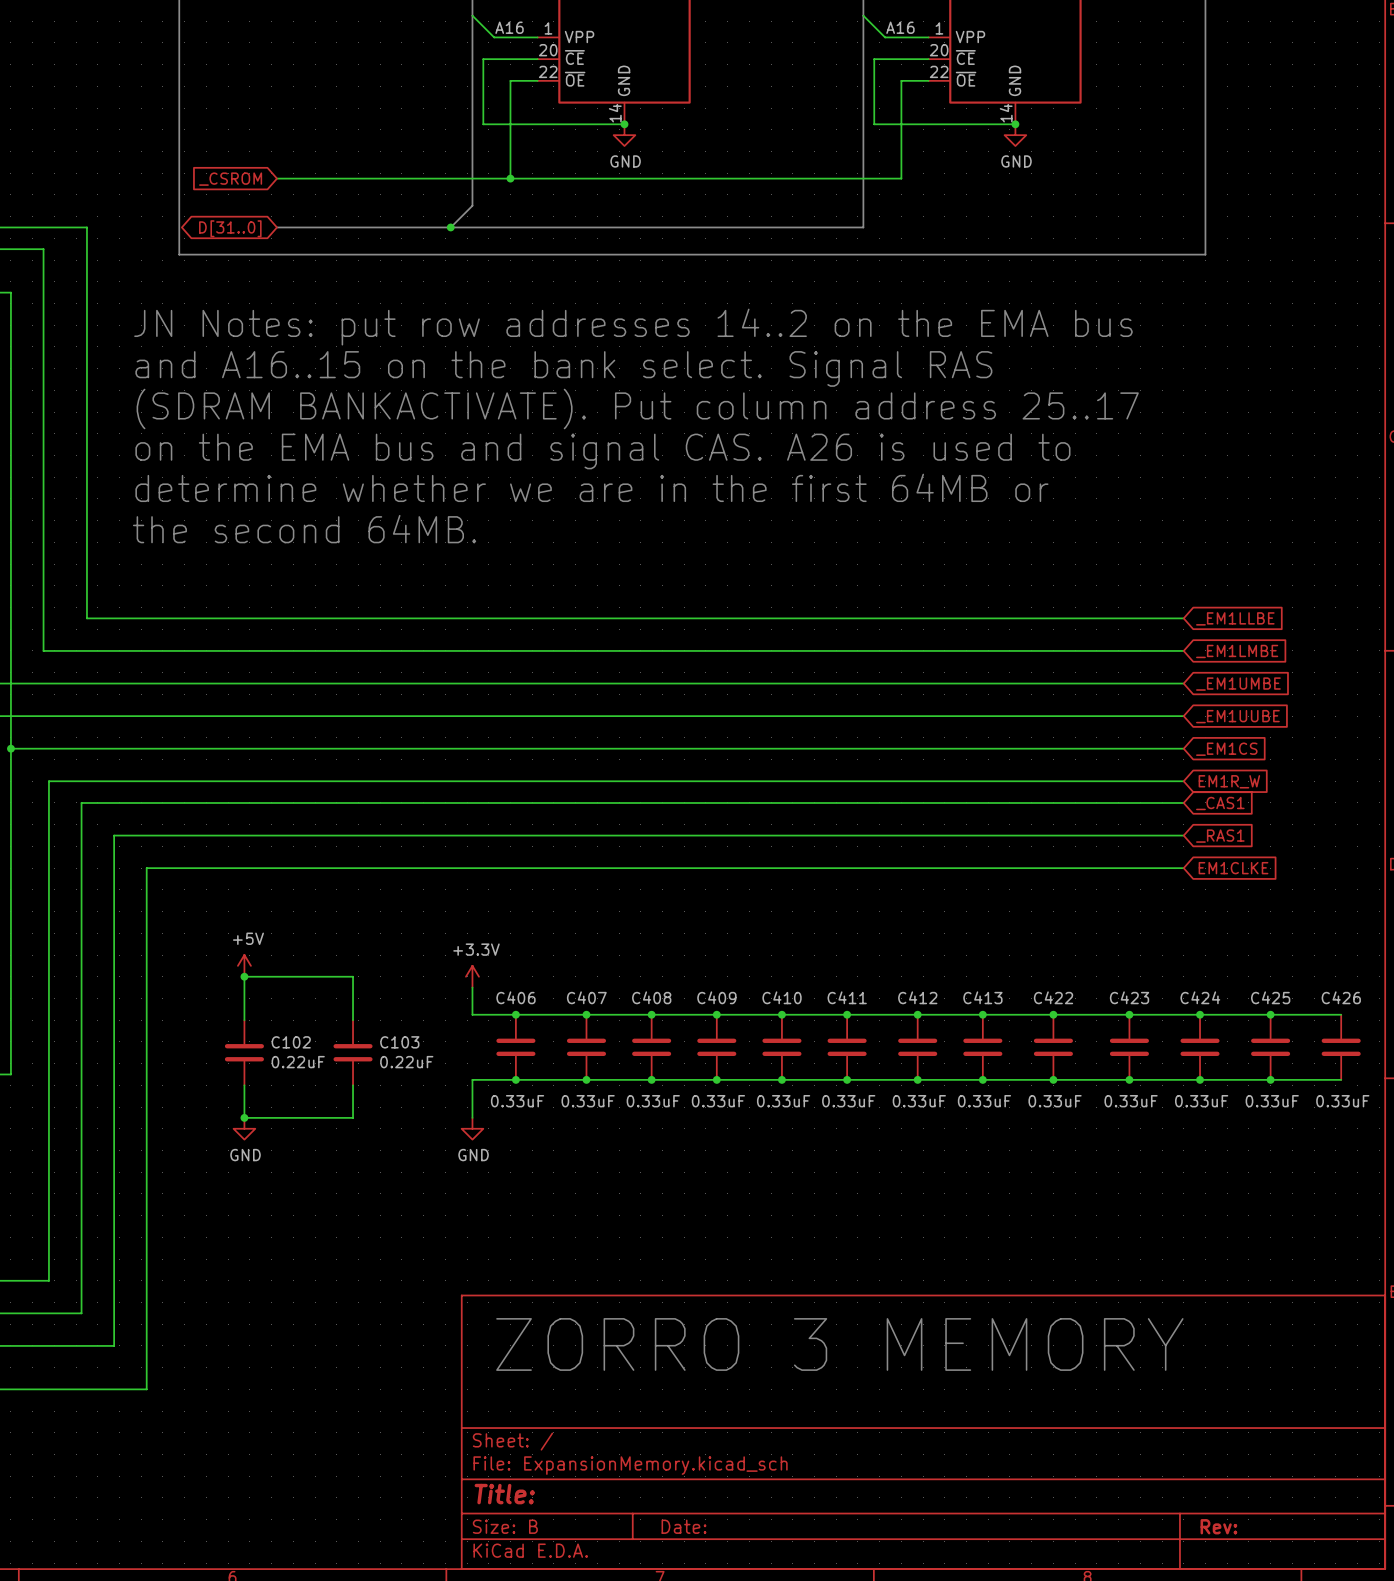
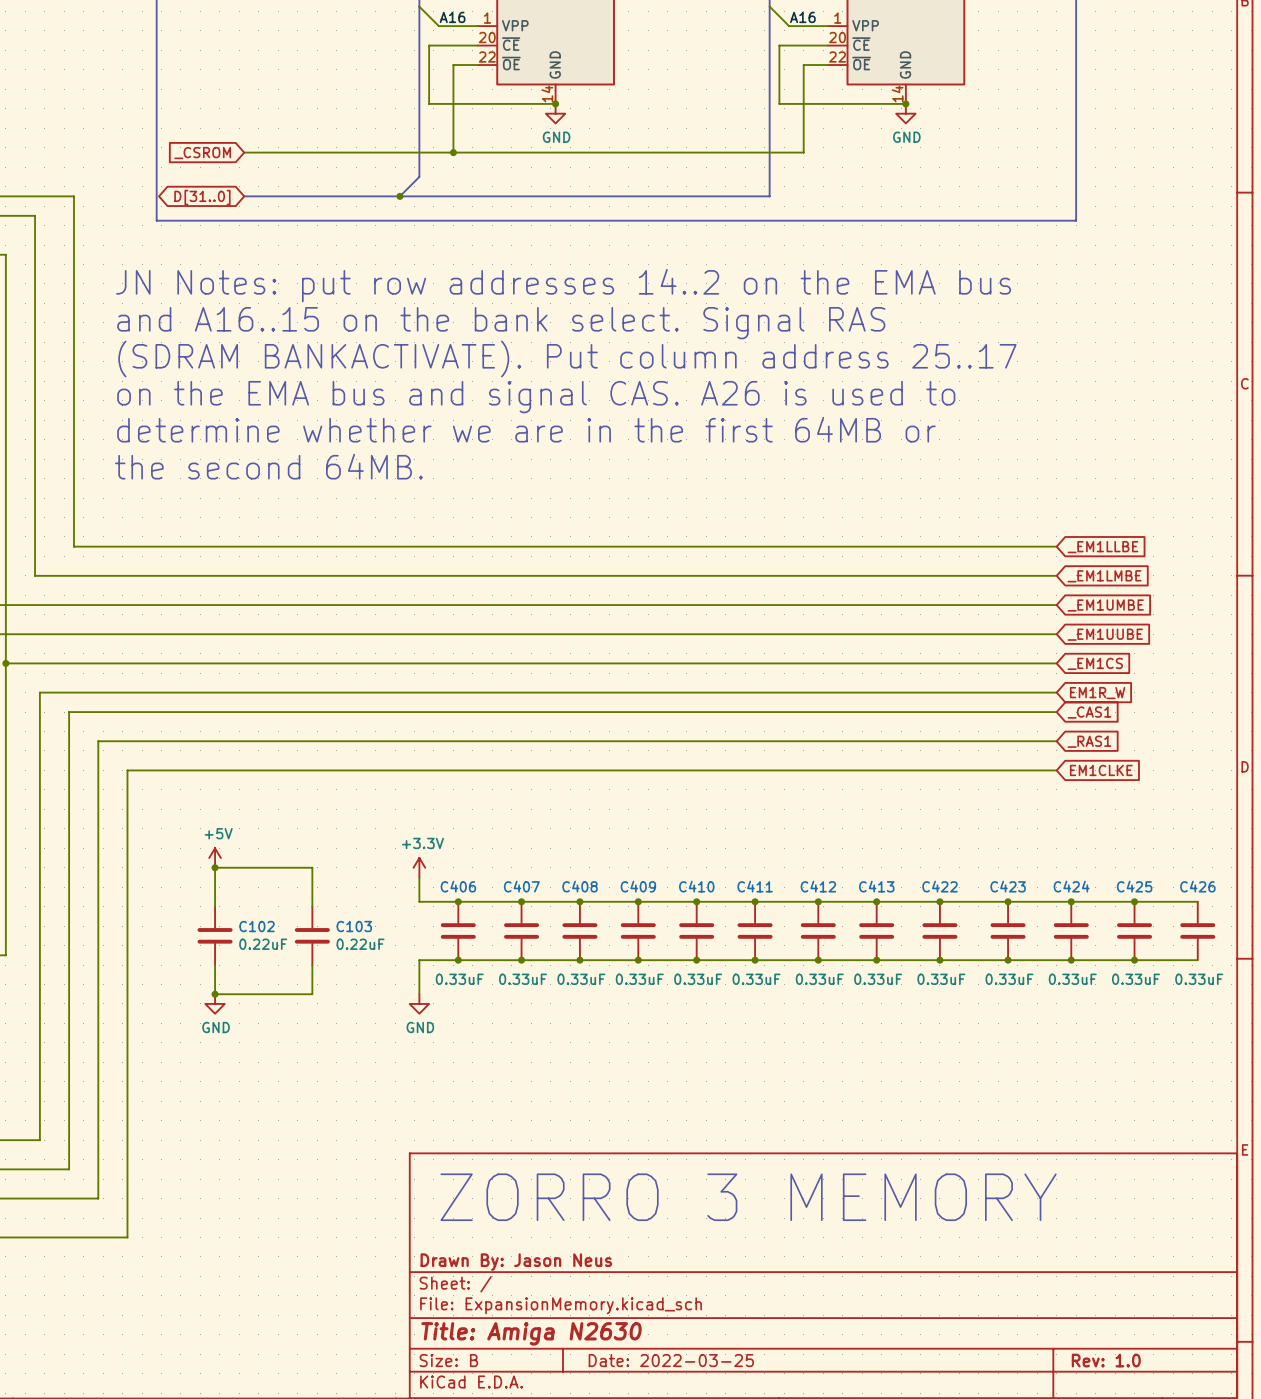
title block: none -> Drawn By: Jason Neus (516, 1262)
title block: Title: (504, 1494) -> Title: Amiga N2630 (531, 1333)
title block: Date: (683, 1526) -> Date: 2022-03-25 (671, 1360)
title block: Rev: (1218, 1526) -> Rev: 1.0 (1106, 1360)

